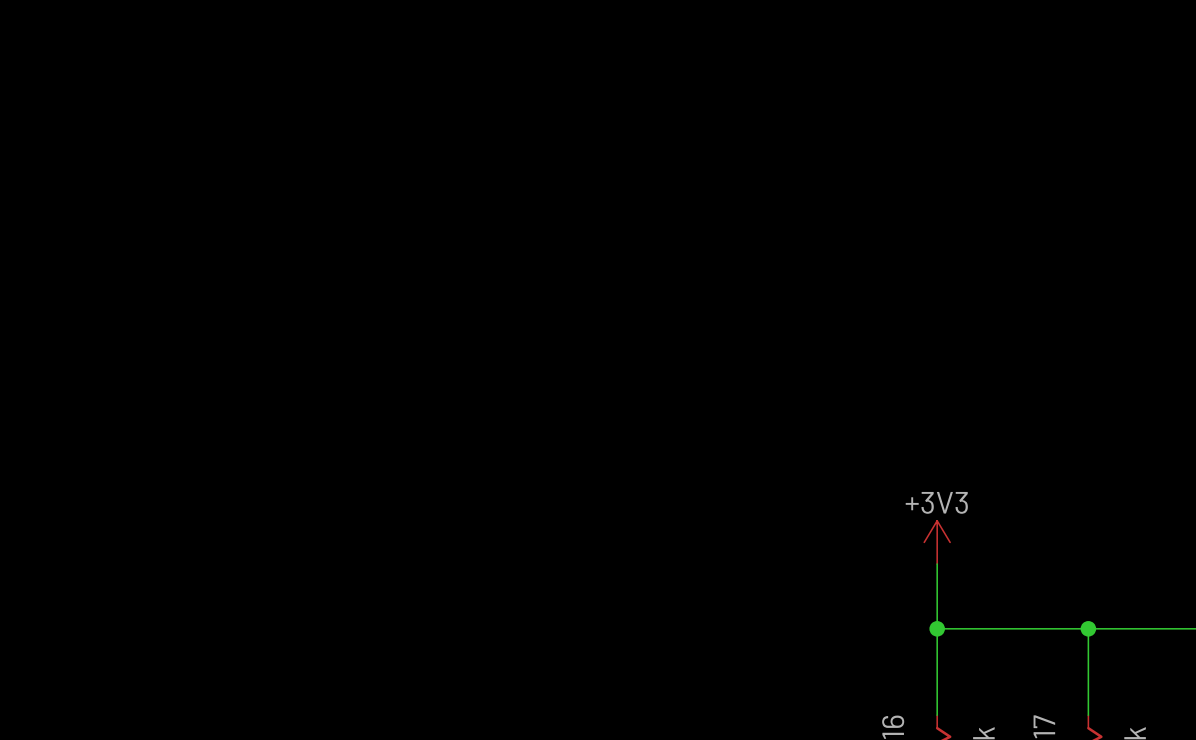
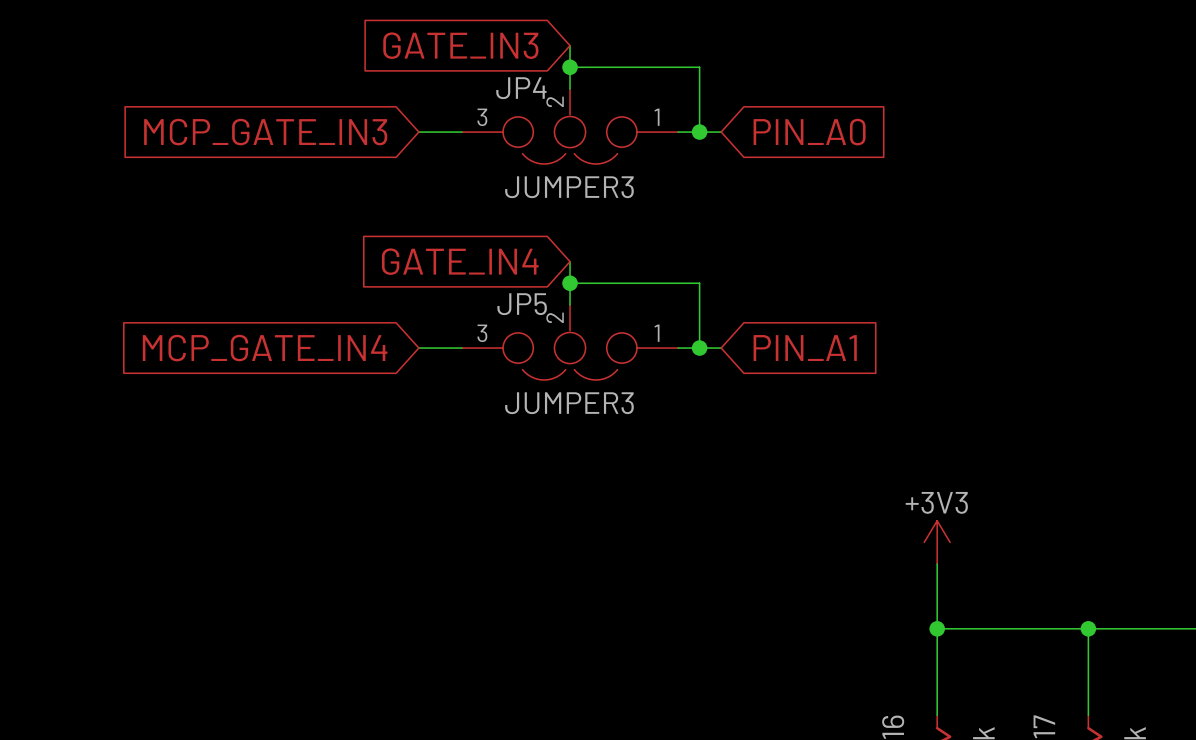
global label: none -> GATE_IN3 (460, 45)
wire: none -> (570, 45) (570, 88)
wire: none -> (570, 67) (699, 67) (699, 132)
junction: none -> (570, 67)
JP4: none -> JUMPER3 (570, 126)
global label: none -> MCP_GATE_IN3 (265, 132)
wire: none -> (418, 132) (462, 132)
wire: none -> (678, 132) (721, 132)
junction: none -> (699, 132)
global label: none -> PIN_A0 (809, 132)
global label: none -> GATE_IN4 (460, 261)
wire: none -> (570, 261) (570, 304)
wire: none -> (570, 283) (699, 283) (699, 348)
junction: none -> (570, 283)
JP5: none -> JUMPER3 (570, 342)
global label: none -> MCP_GATE_IN4 (265, 348)
wire: none -> (418, 348) (462, 348)
wire: none -> (678, 348) (721, 348)
junction: none -> (699, 348)
global label: none -> PIN_A1 (805, 348)

